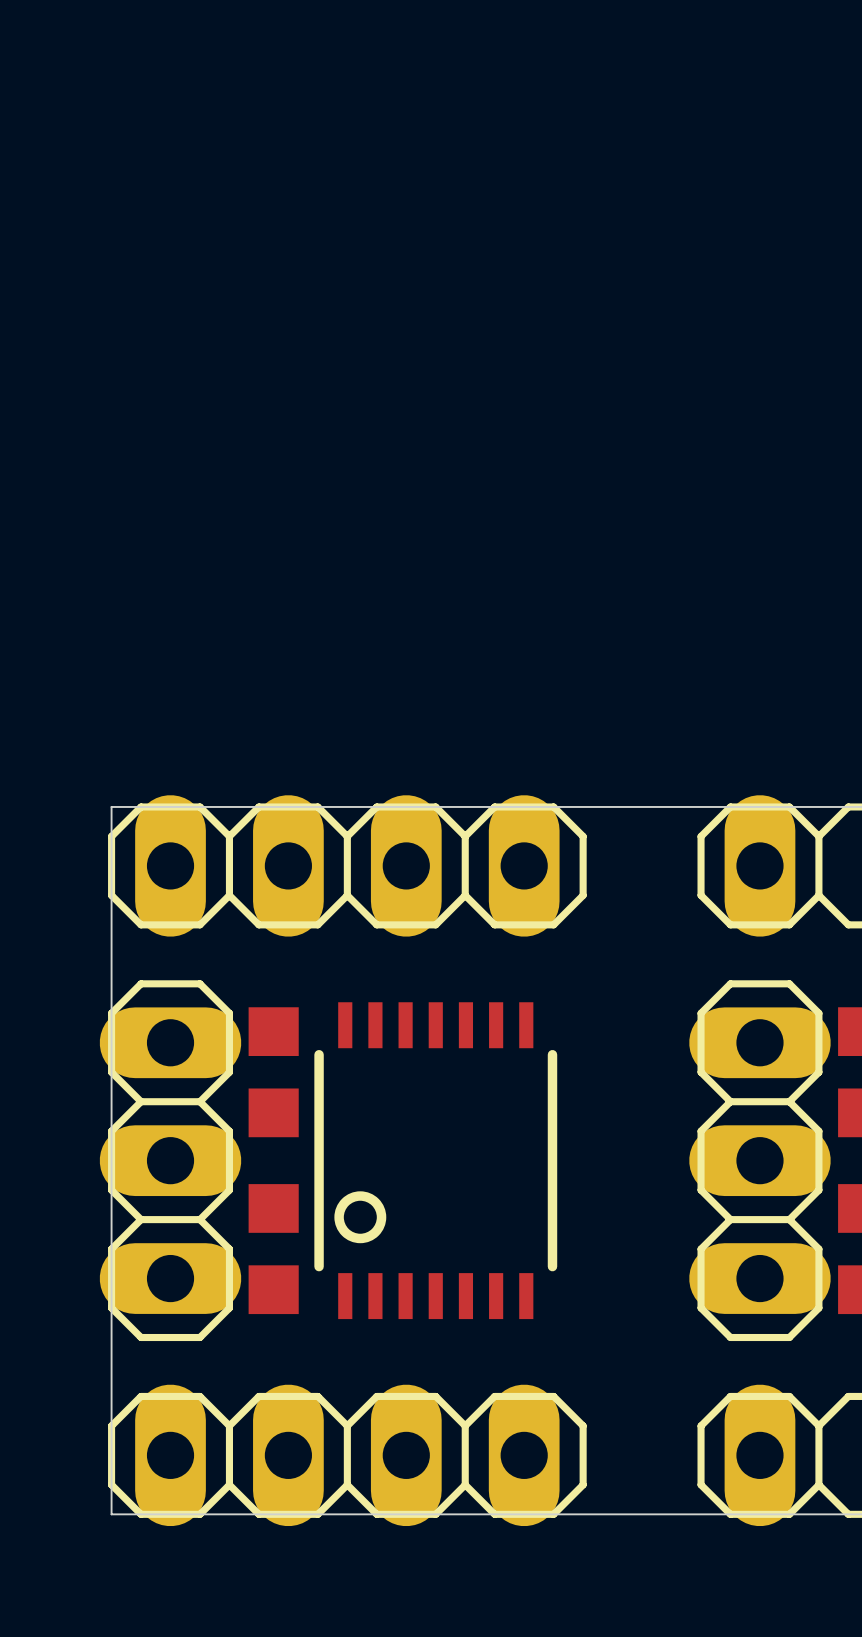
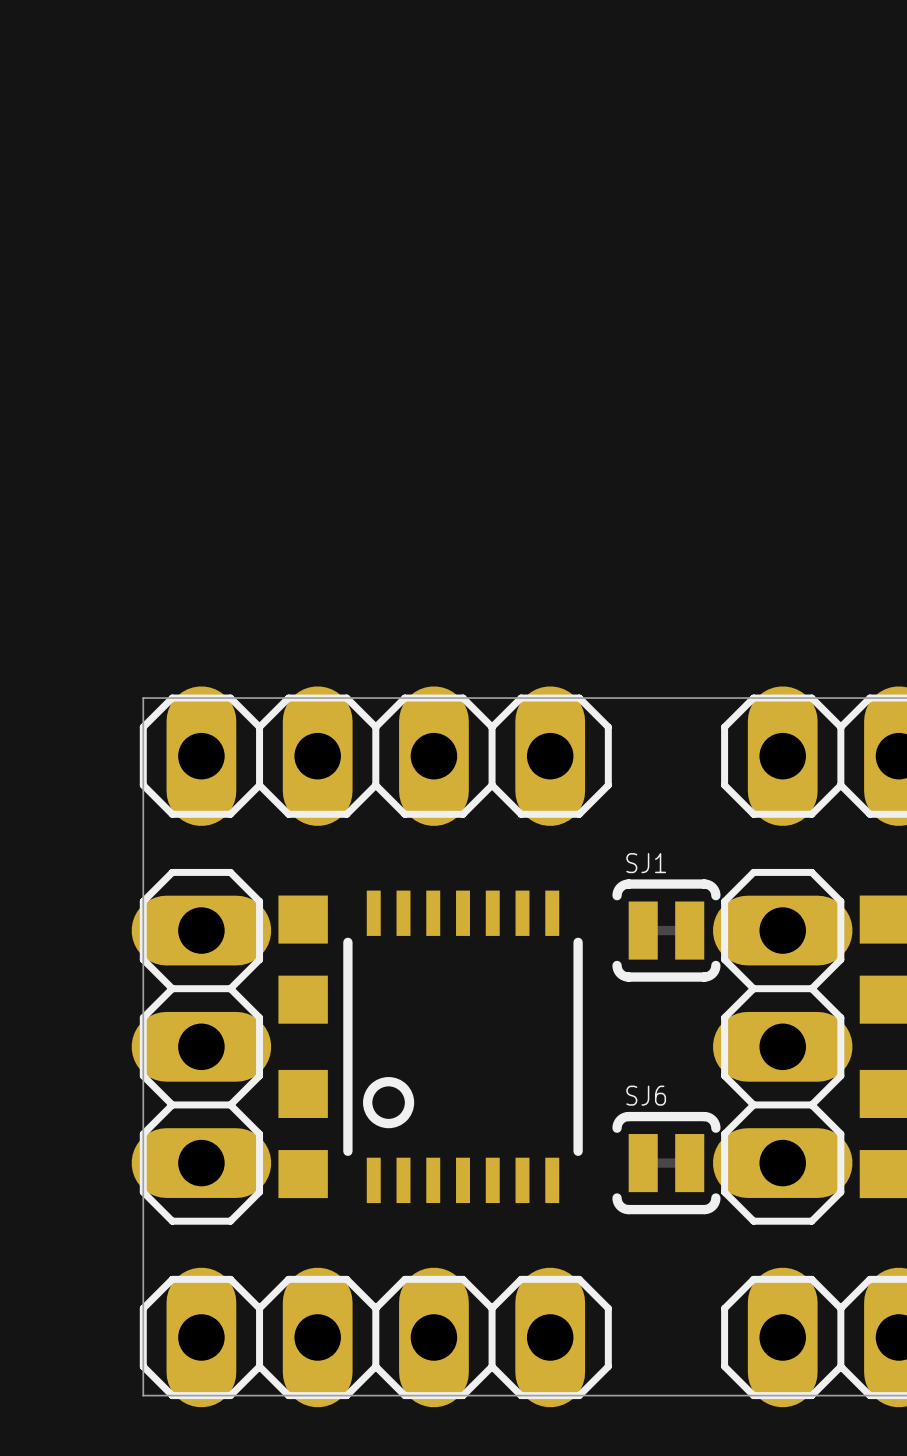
SJ1: none -> (666, 930)
SJ6: none -> (666, 1163)

